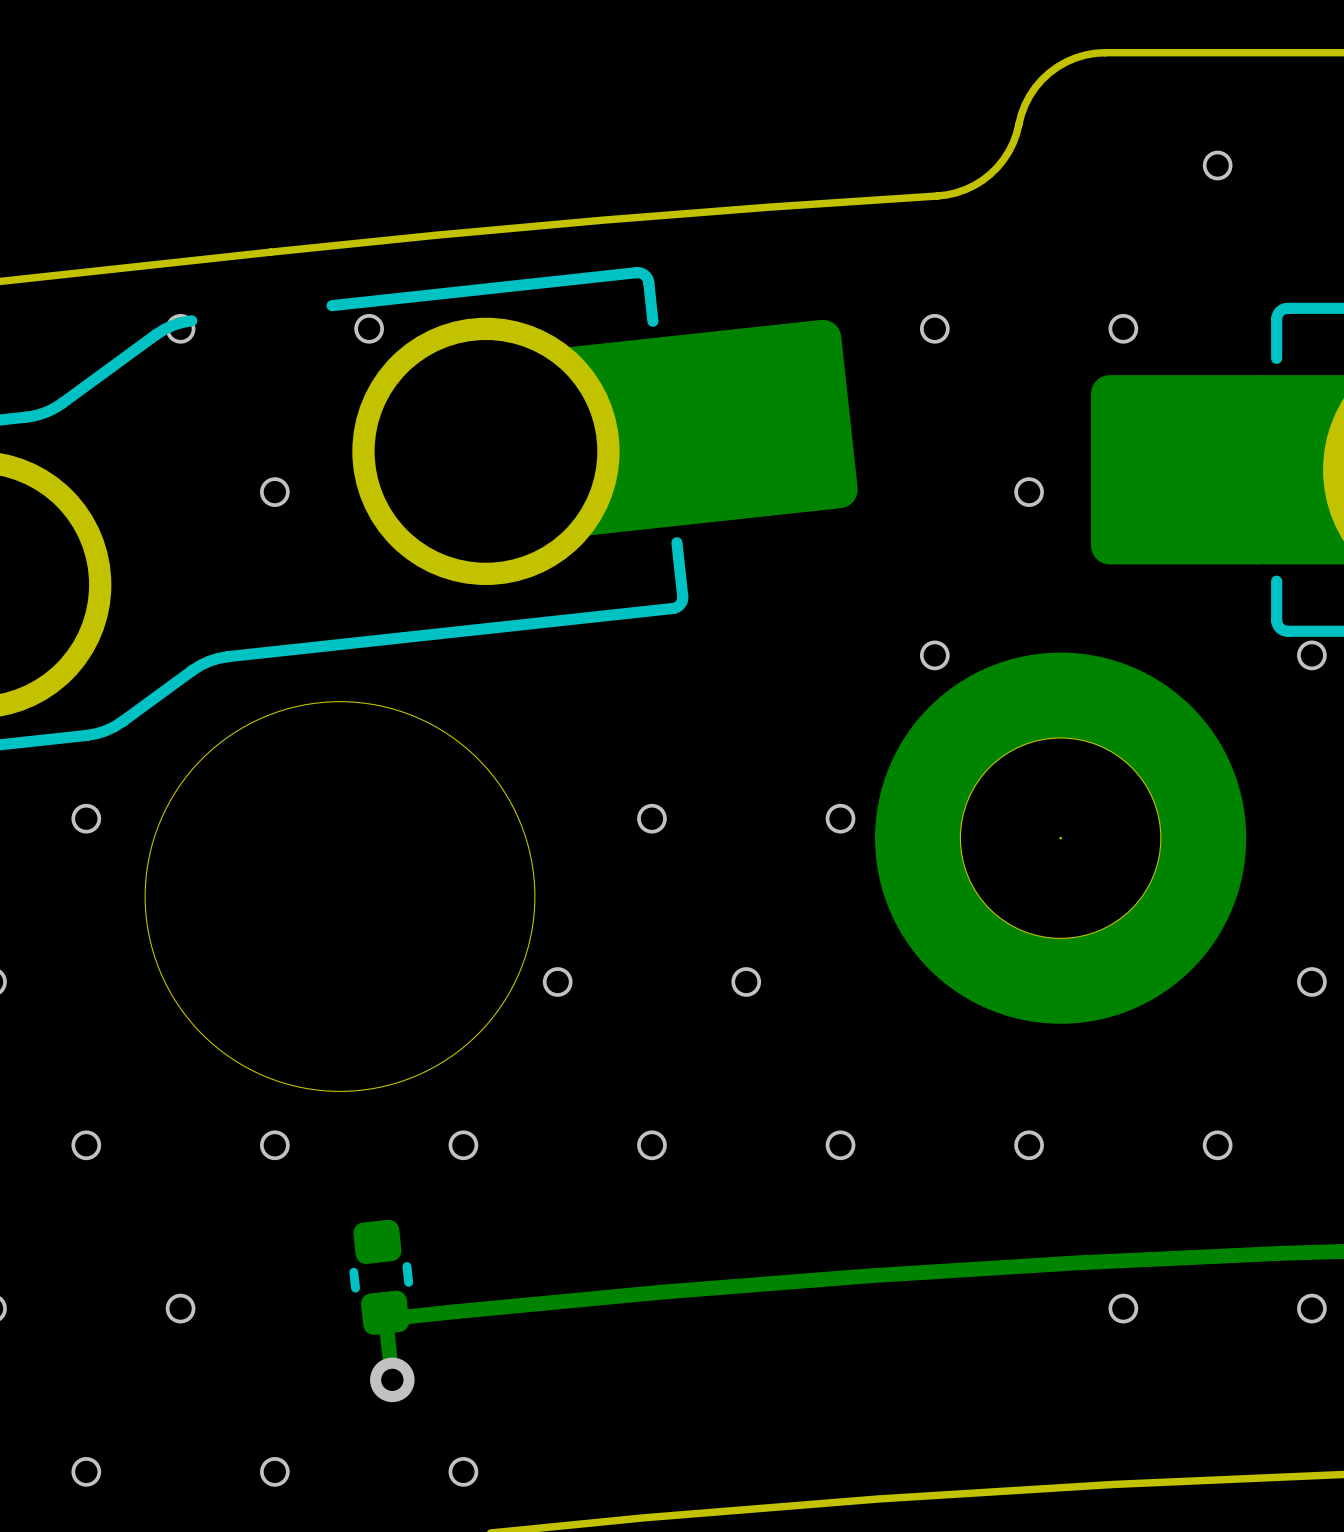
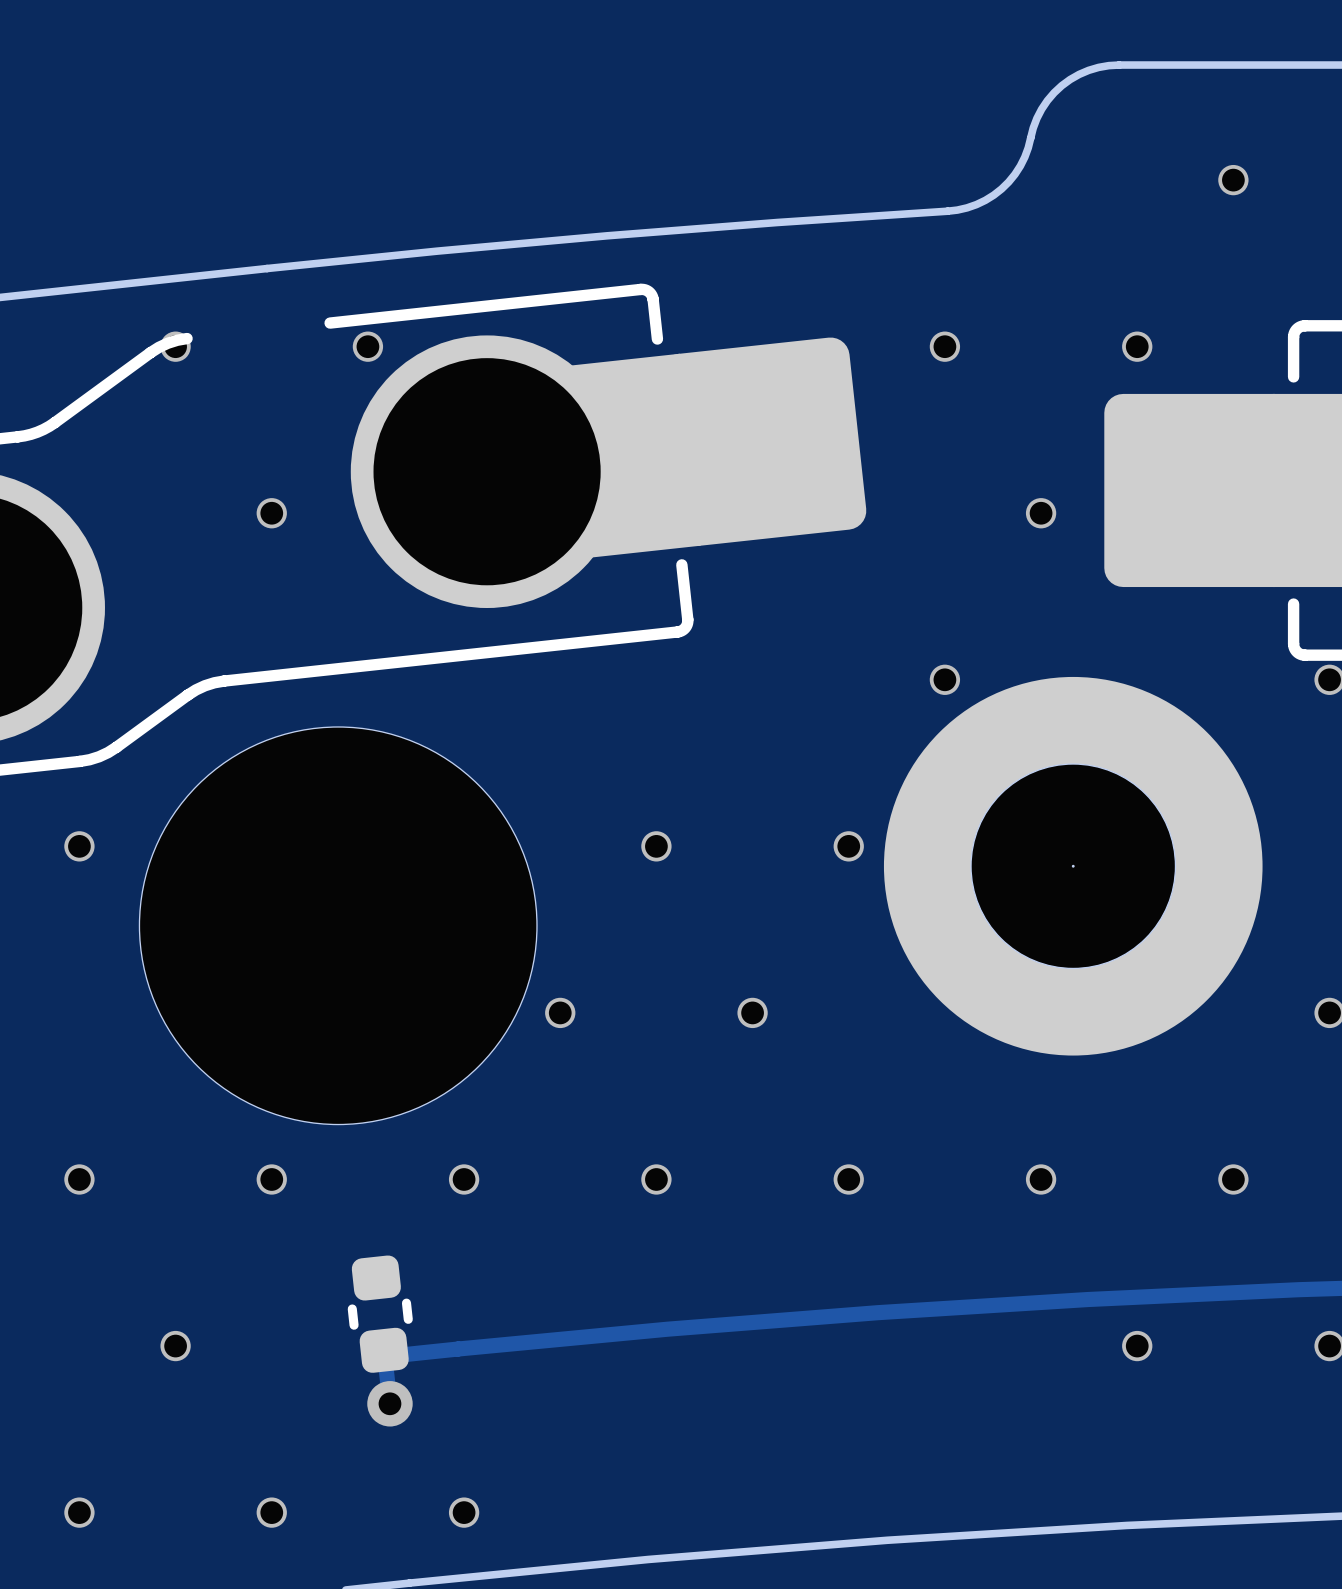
via position: (392, 1379) -> (389, 1403)

